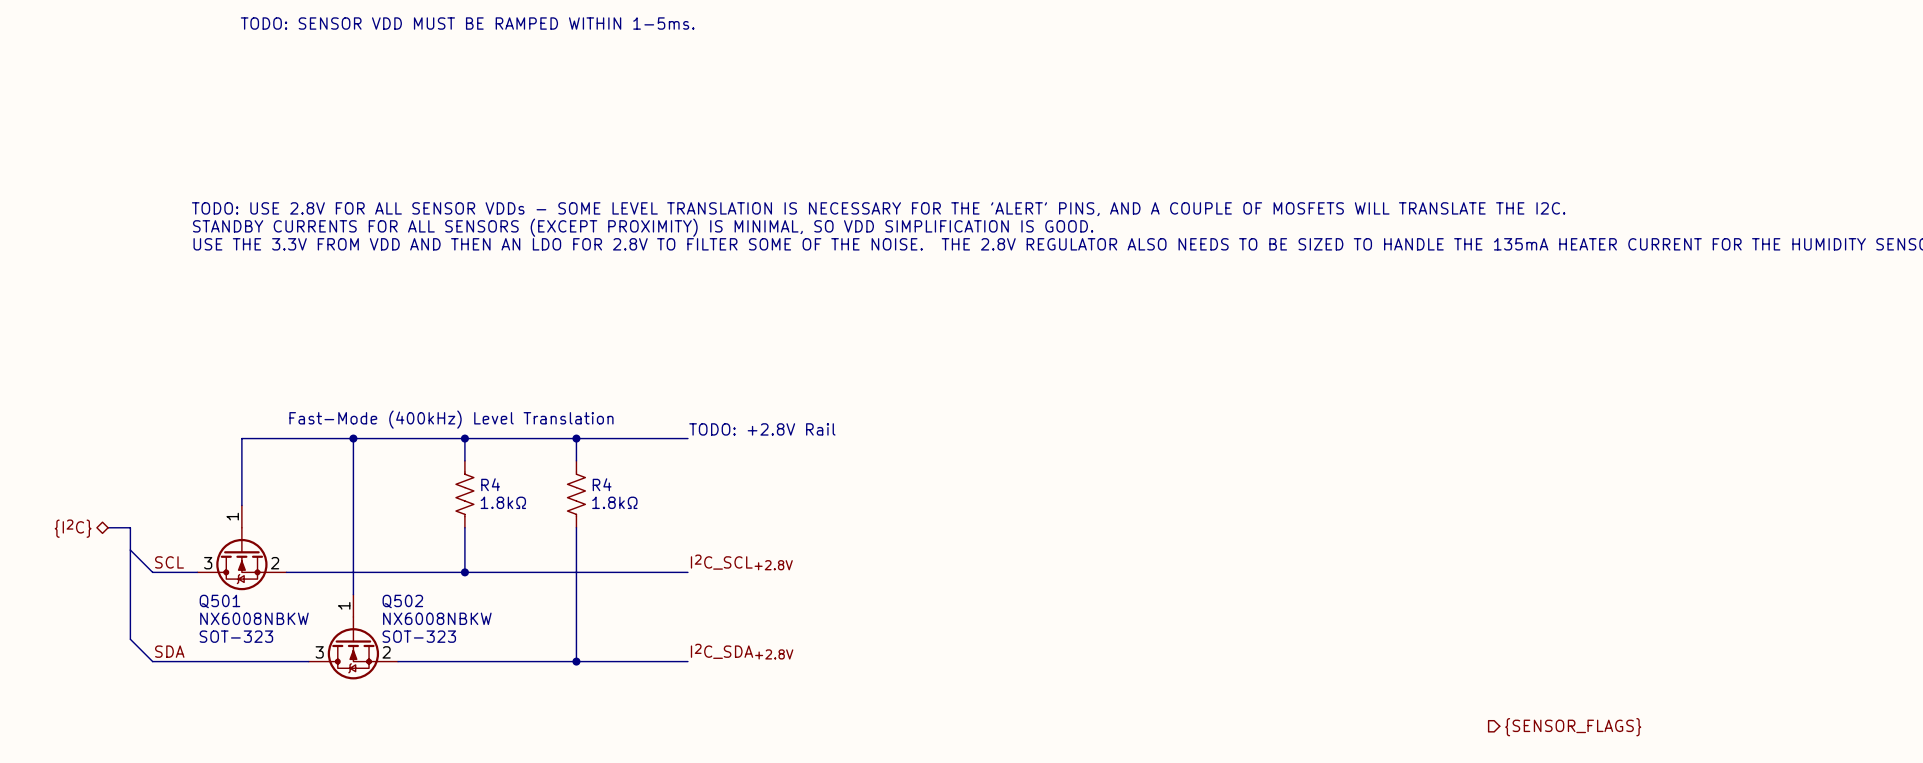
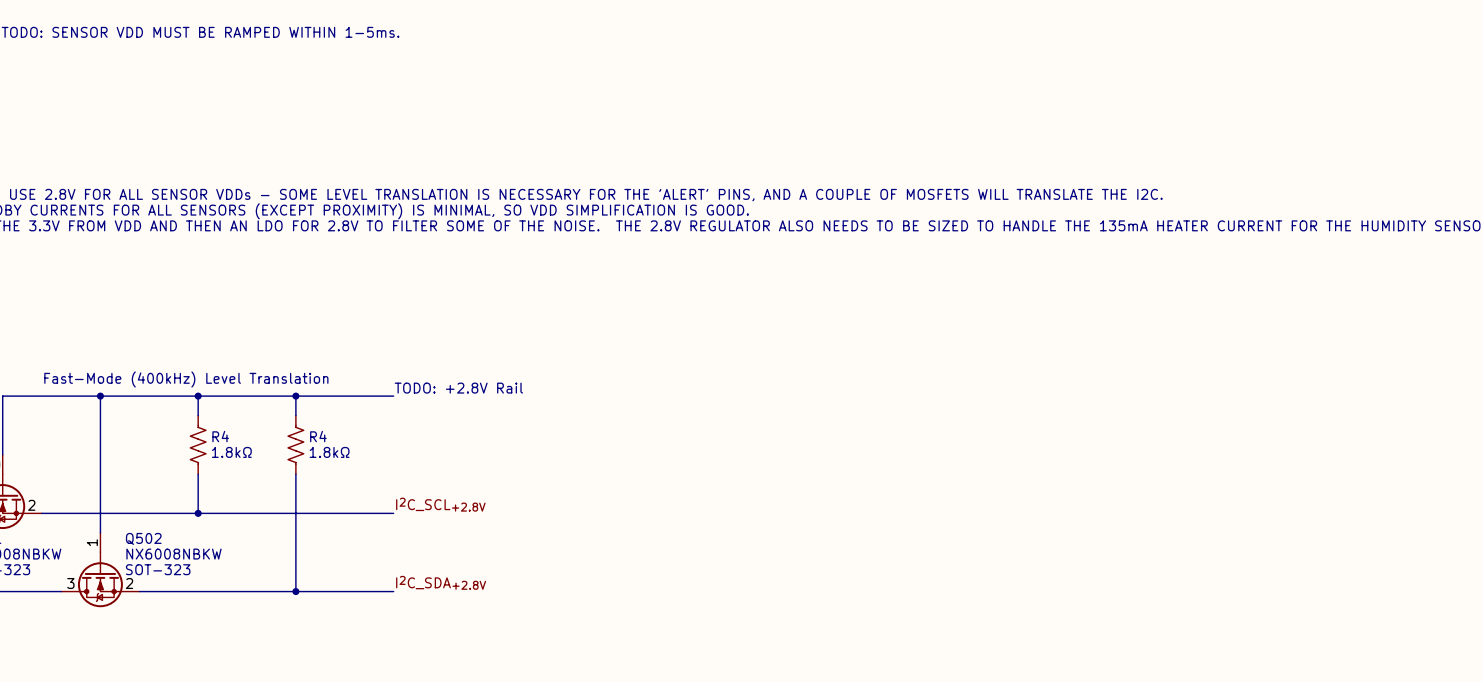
hierarchical label: {SENSOR_FLAGS} (1573, 727) -> none

